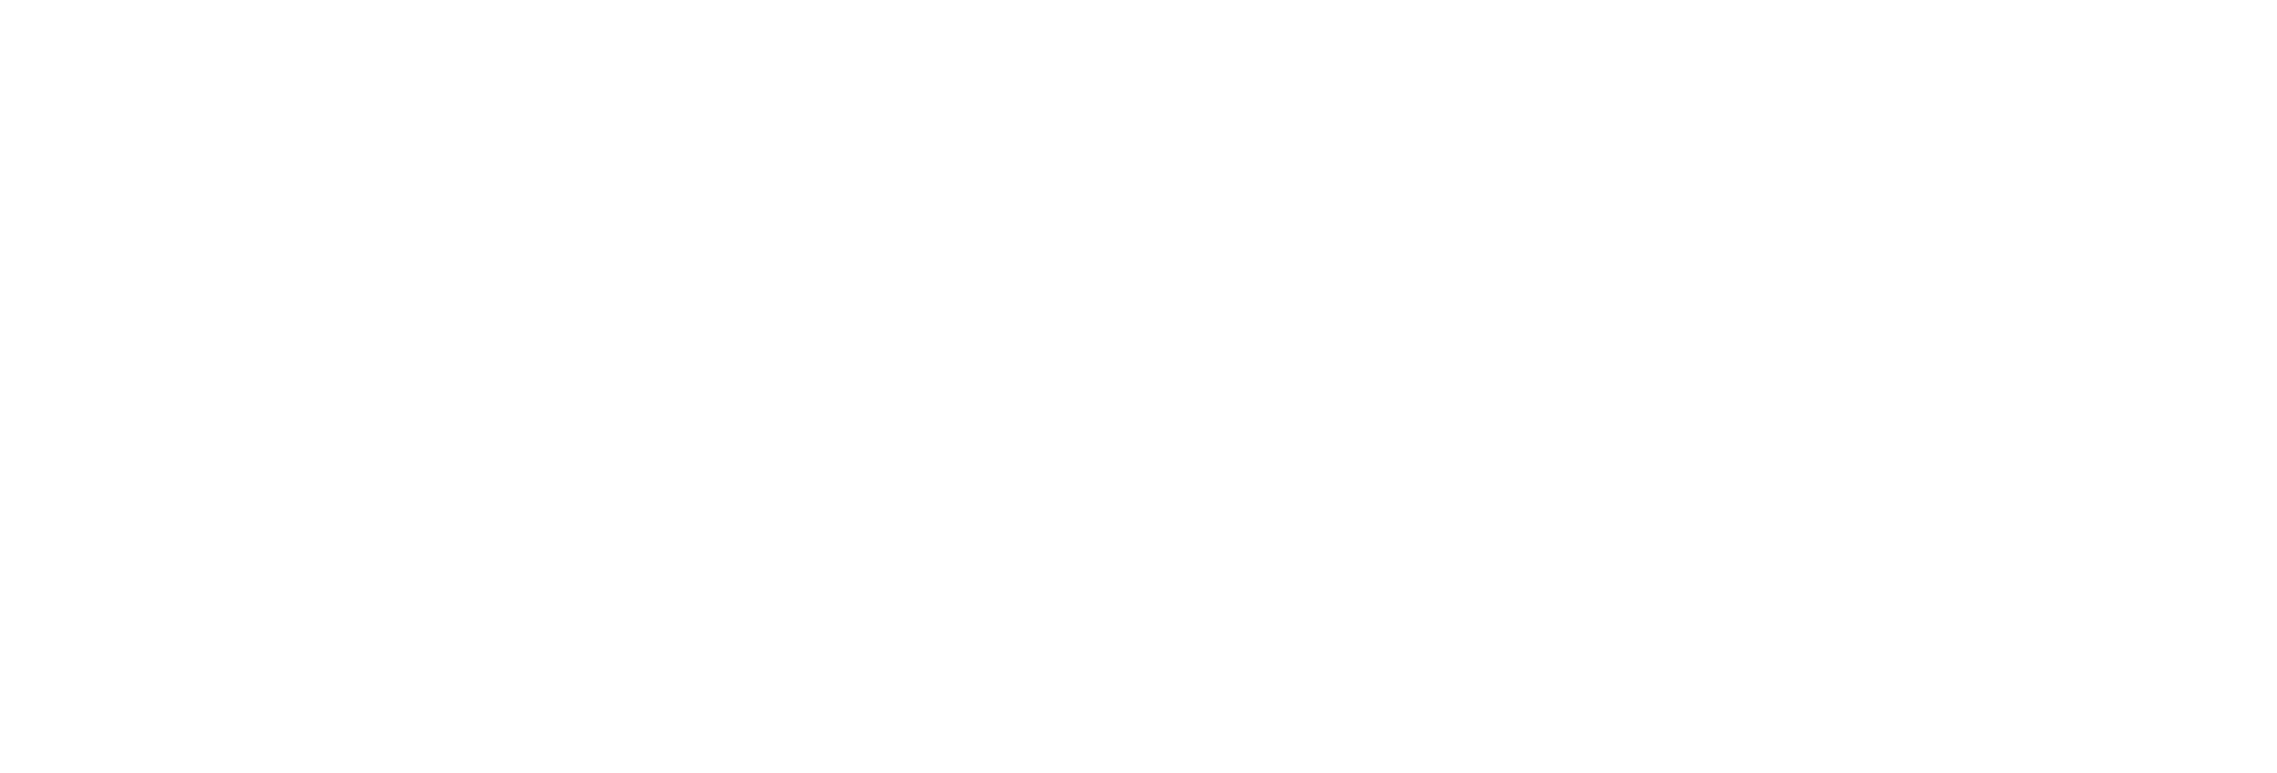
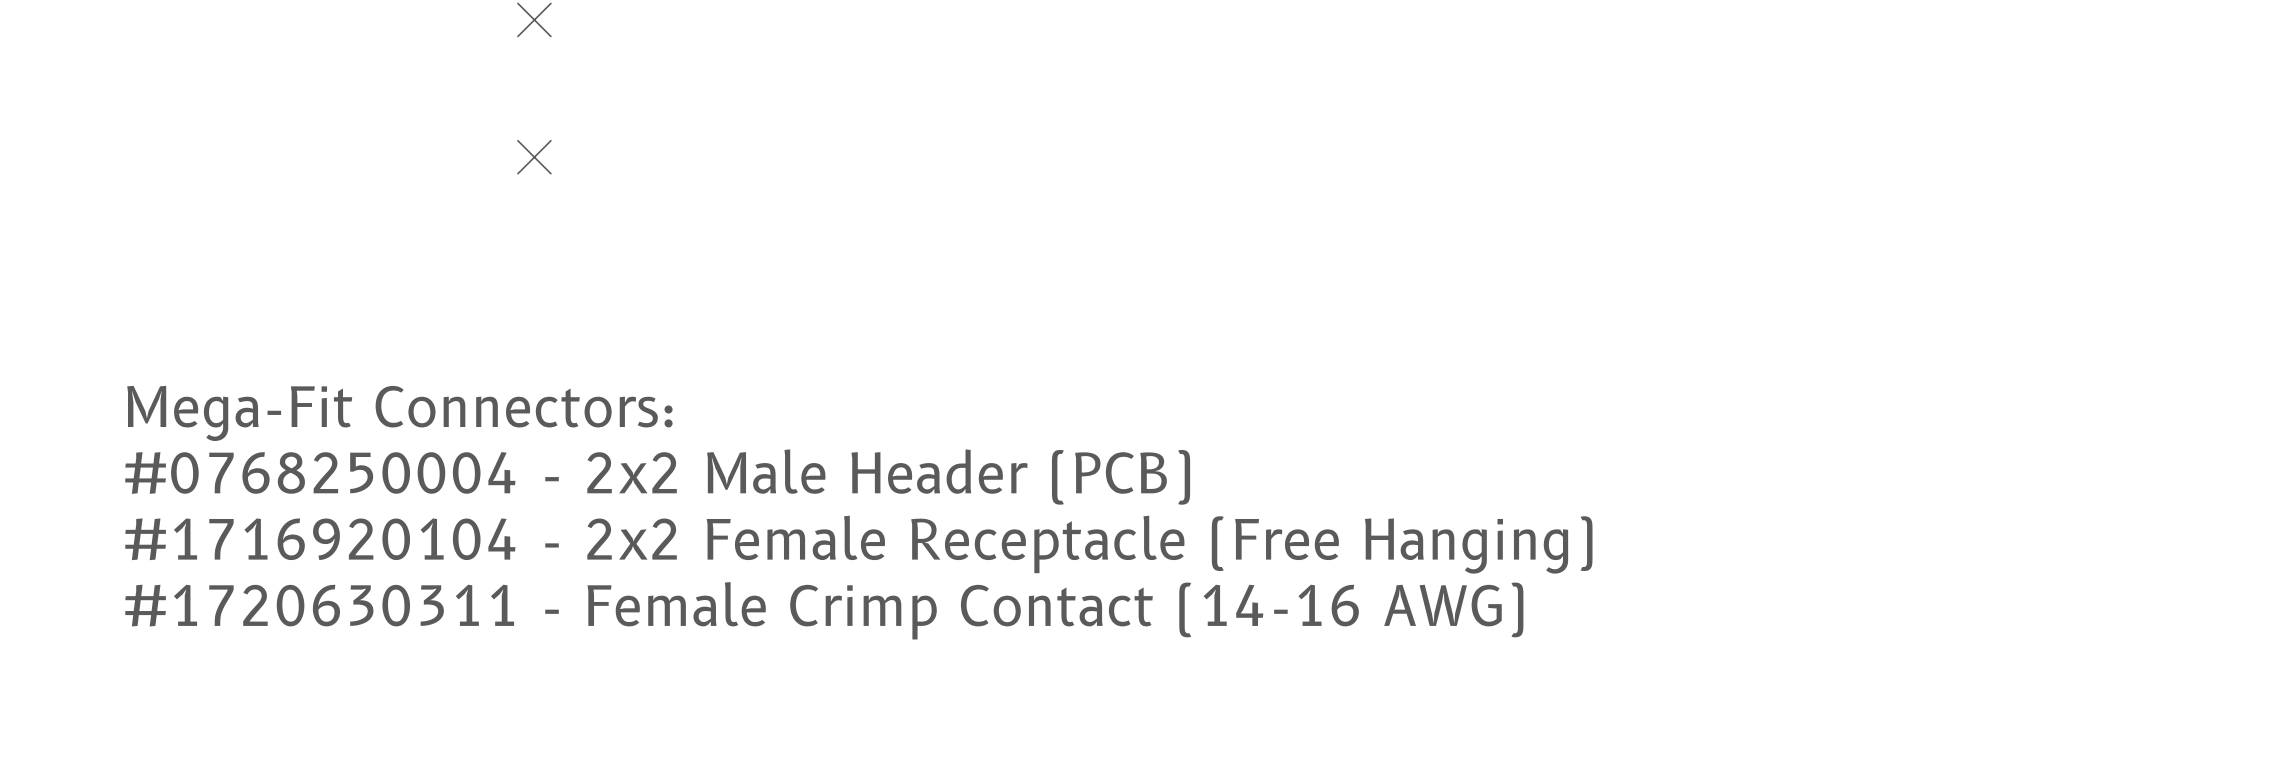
no-connect mark: none -> (534, 19)
no-connect mark: none -> (534, 157)
text: none -> Mega-Fit Connectors: (399, 413)
text: none -> #0768250004 - 2x2 Male Header (PCB) (657, 477)
text: none -> #1716920104 - 2x2 Female Receptacle (Free Hanging) (858, 544)
text: none -> #1720630311 - Female Crimp Contact (14-16 AWG) (824, 610)

